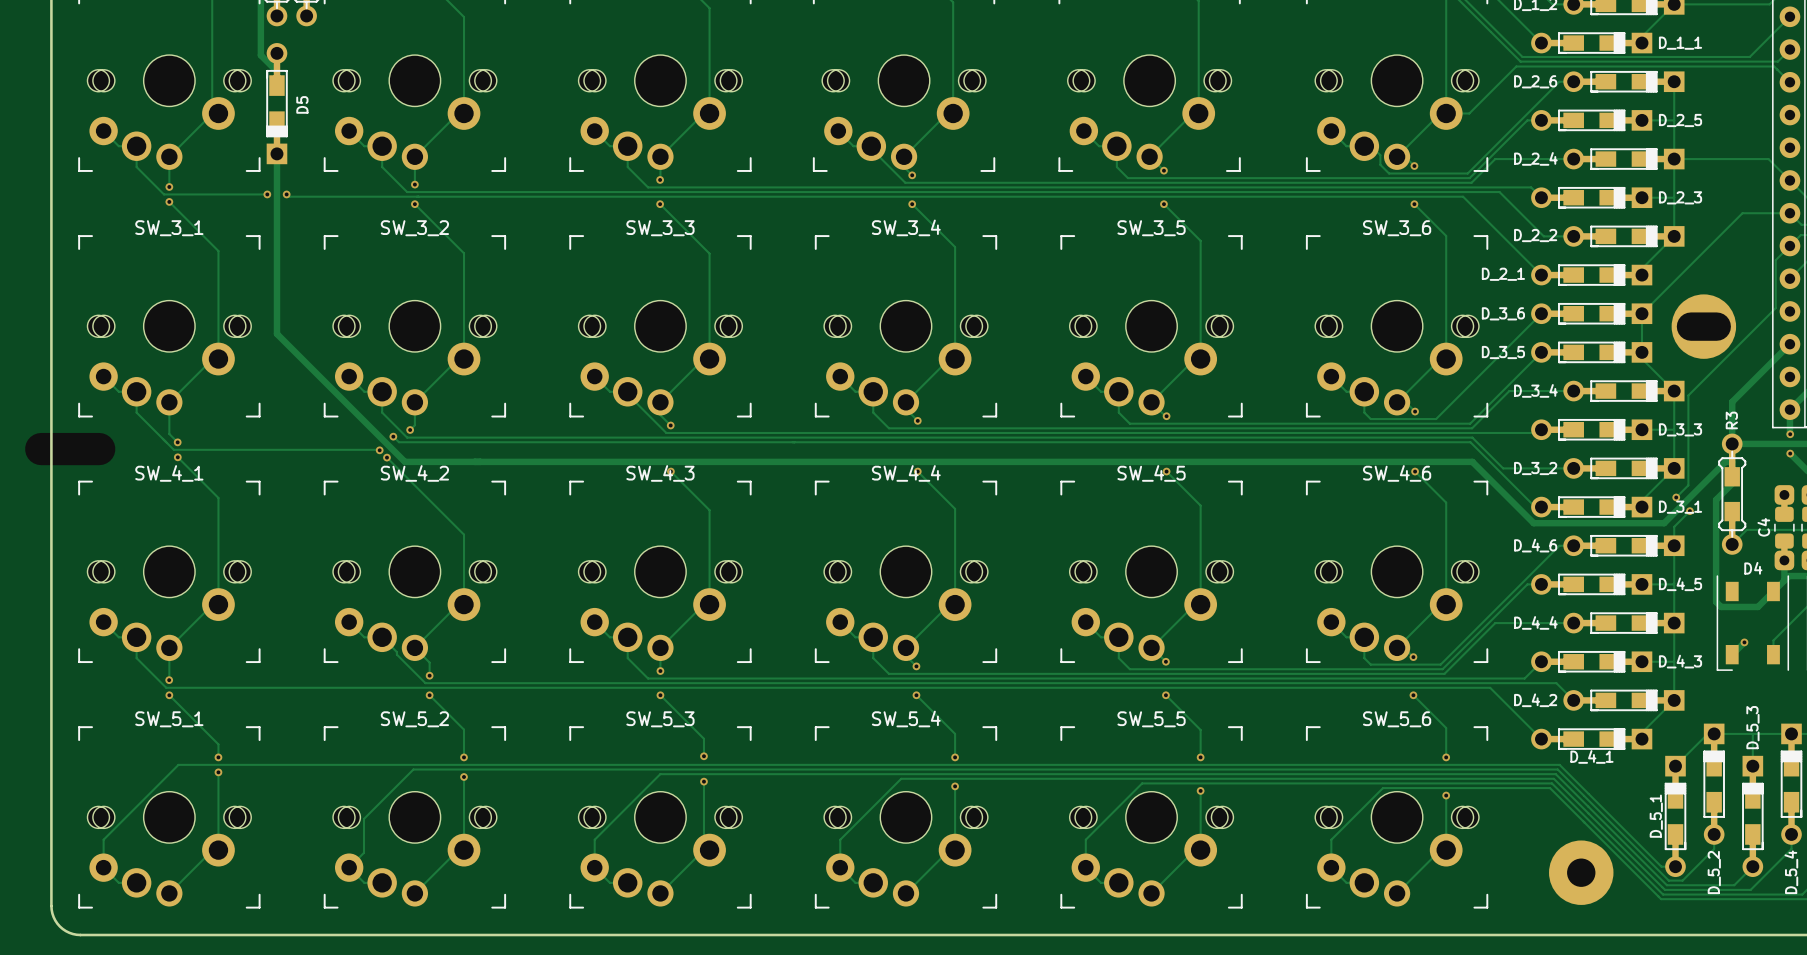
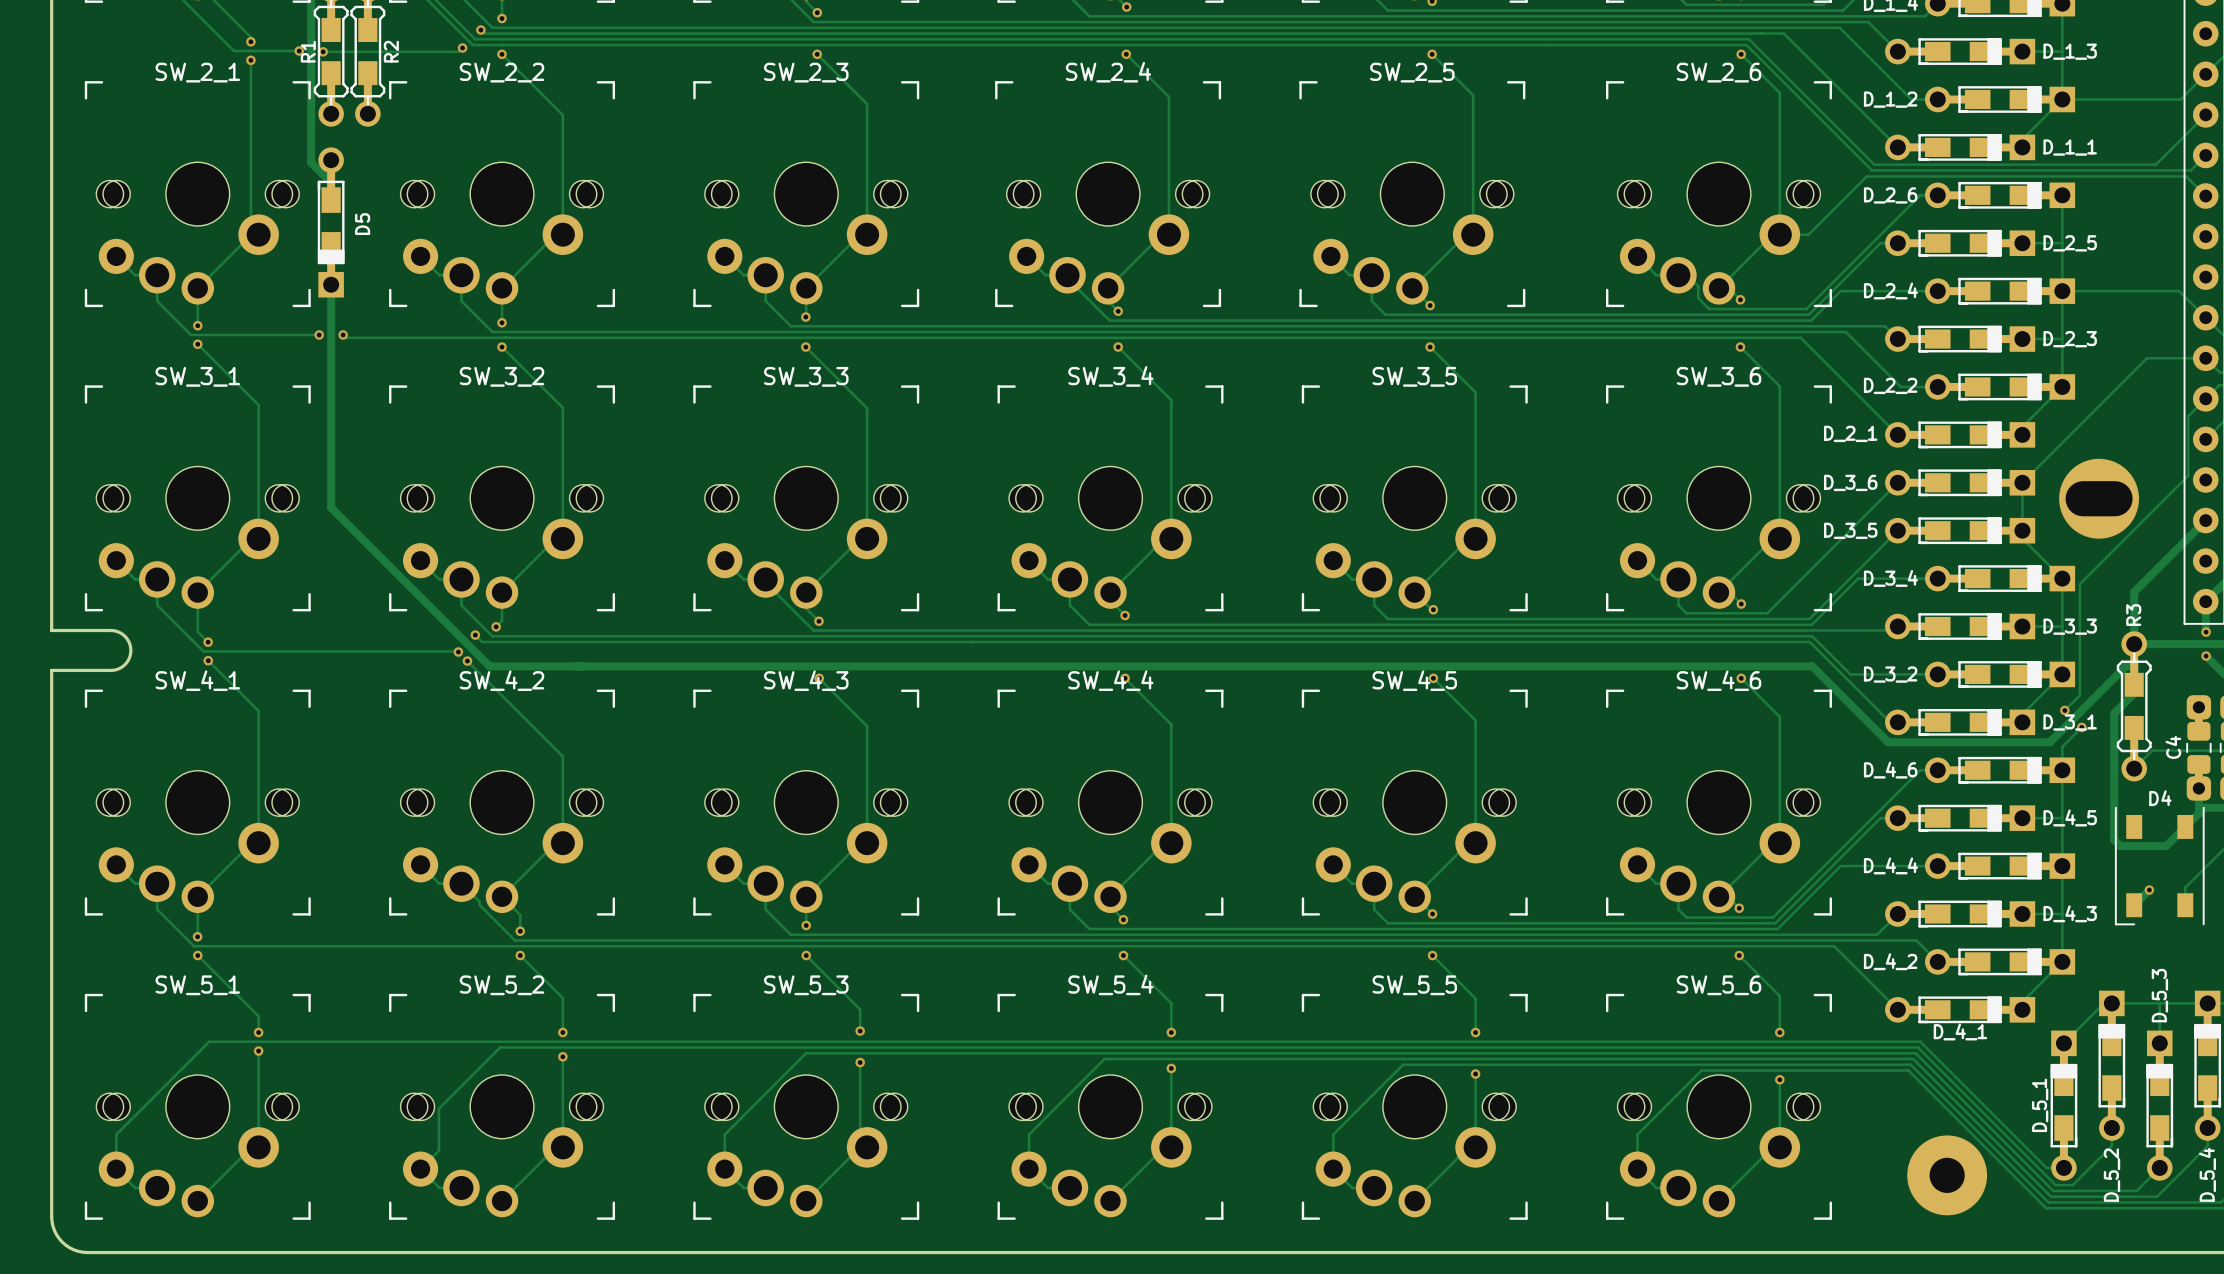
board edge: (51, 432) (51, 465) -> (51, 630) (116, 631) (126, 638) (130, 650) (126, 662) (116, 669) (51, 670)
part: (70, 449) -> none

